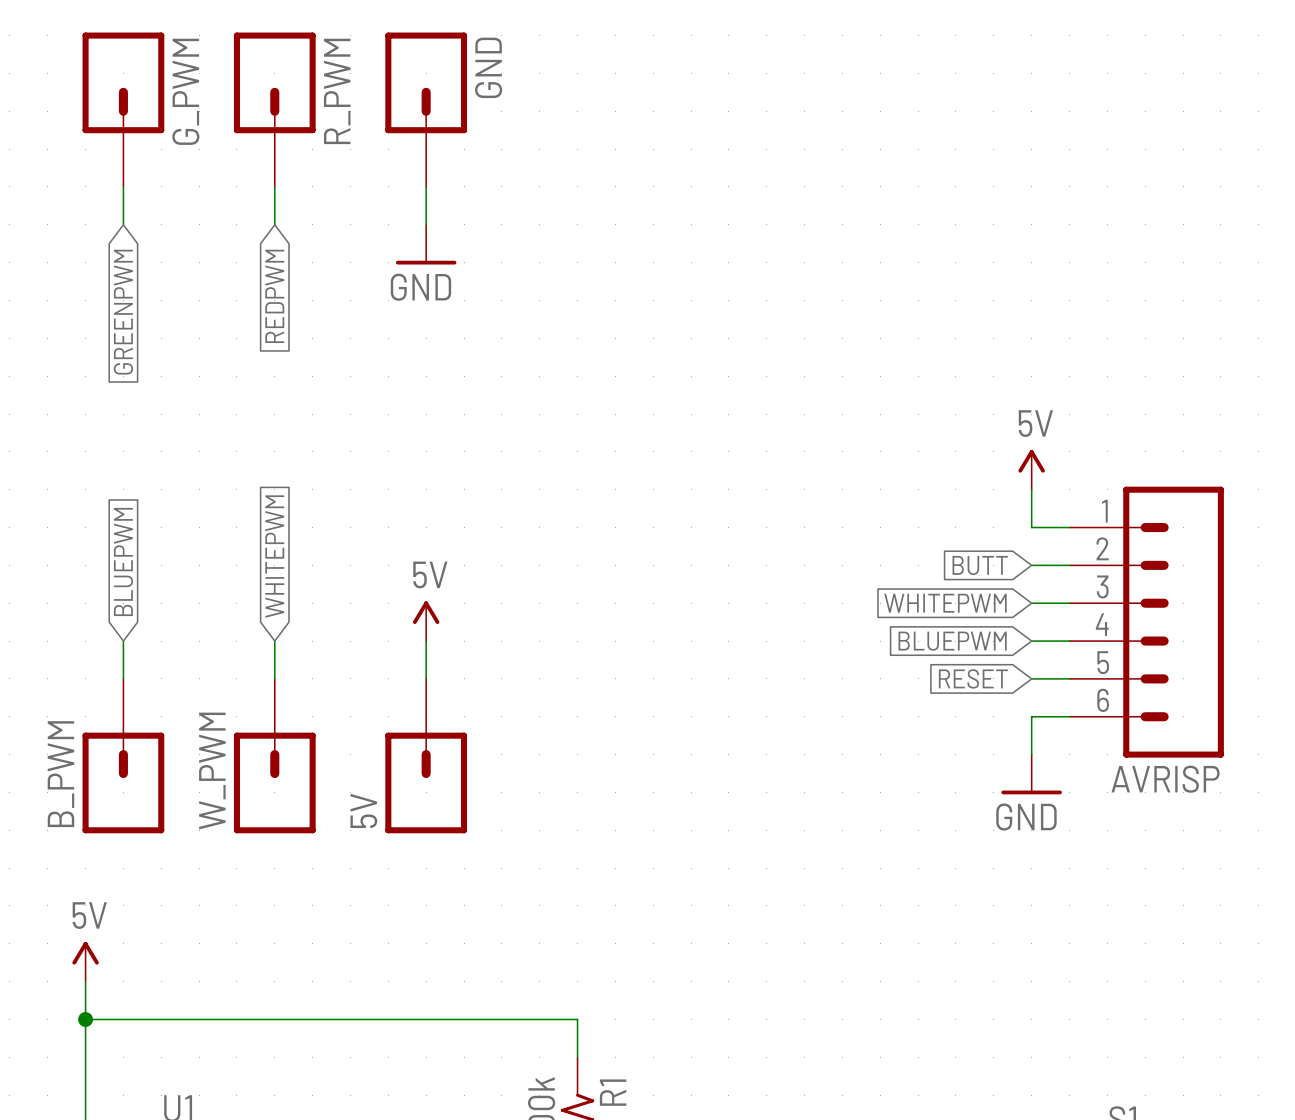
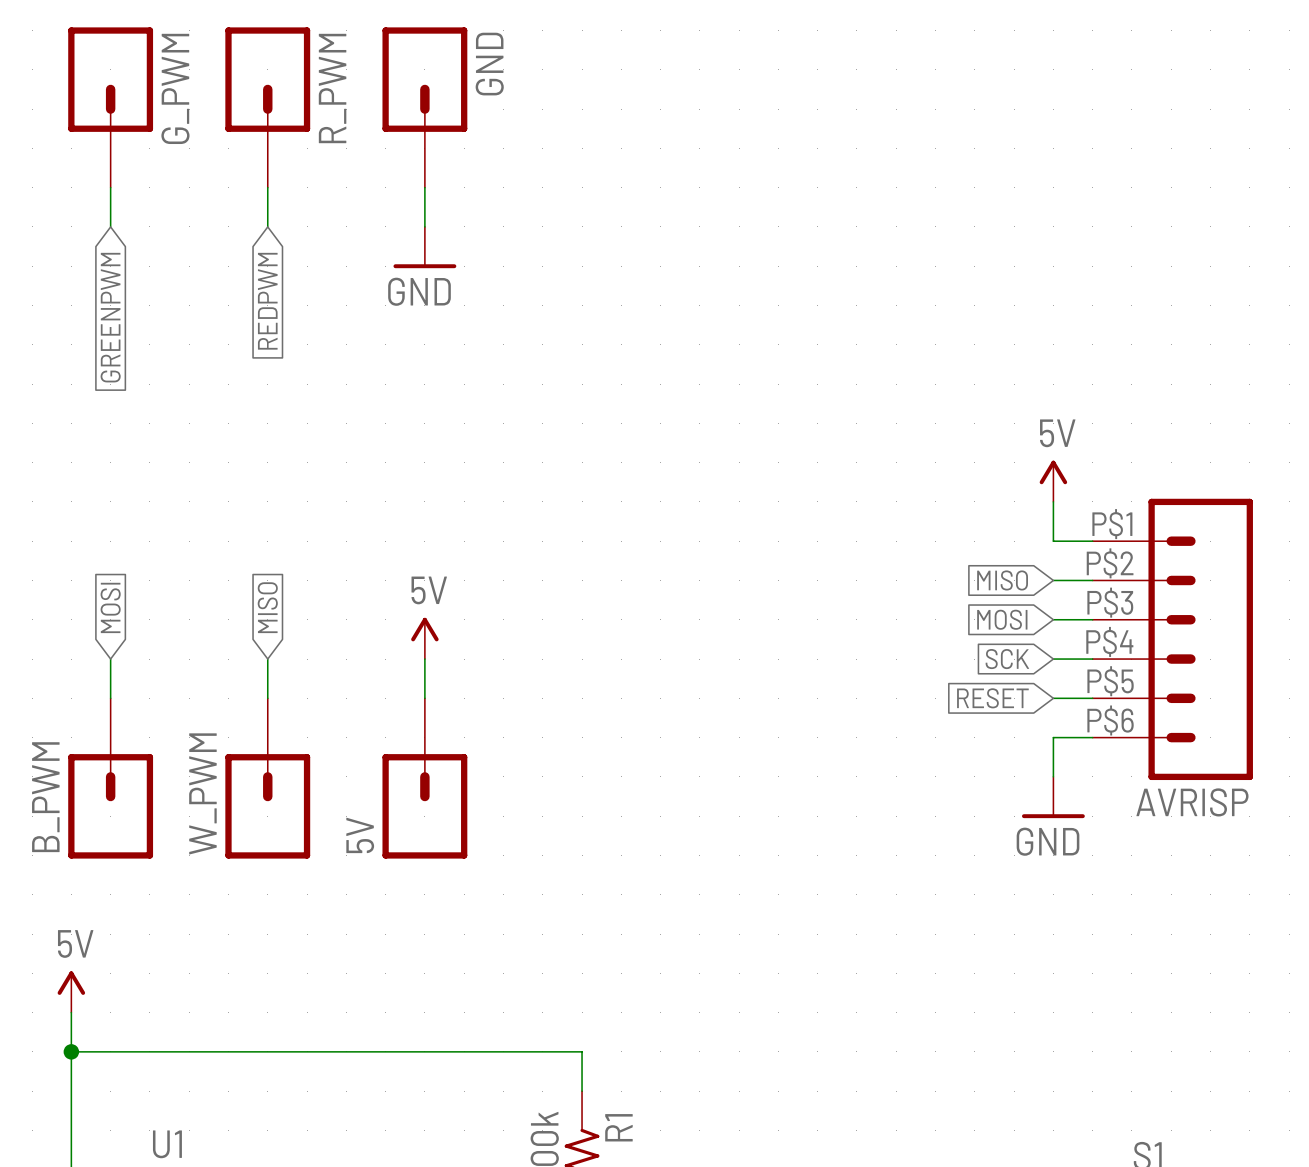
AVRISP pin number: 1 (1104, 511) -> P$1 (1112, 524)
AVRISP pin number: 2 (1102, 548) -> P$2 (1110, 563)
global label: WHITEPWM (274, 556) -> MISO (267, 607)
global label: BLUEPWM (123, 561) -> MOSI (110, 607)
global label: BUTT (980, 565) -> MISO (1002, 580)
AVRISP pin number: 3 (1102, 586) -> P$3 (1110, 602)
global label: WHITEPWM (945, 603) -> MOSI (1002, 619)
AVRISP pin number: 4 (1102, 624) -> P$4 (1109, 641)
global label: BLUEPWM (952, 641) -> SCK (1007, 659)
AVRISP pin number: 5 (1103, 662) -> P$5 (1110, 681)
AVRISP pin number: 6 (1103, 700) -> P$6 (1110, 720)

